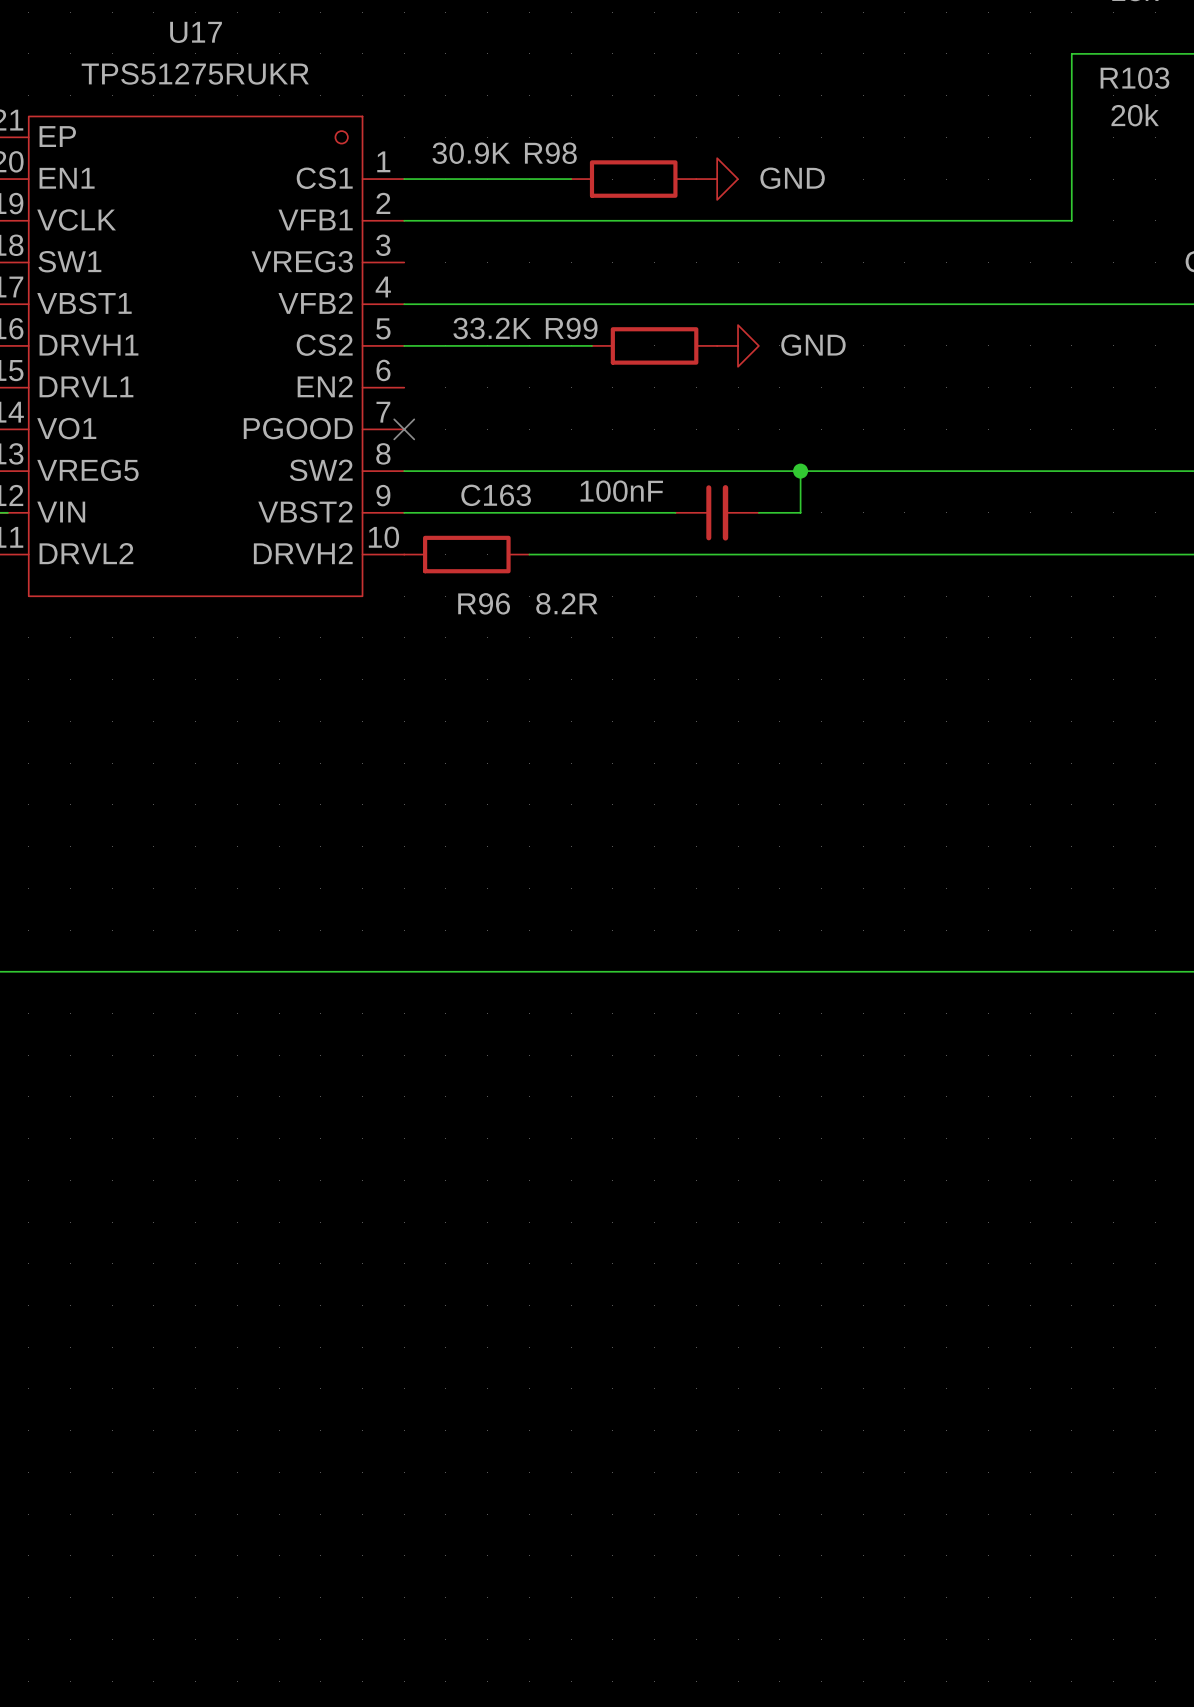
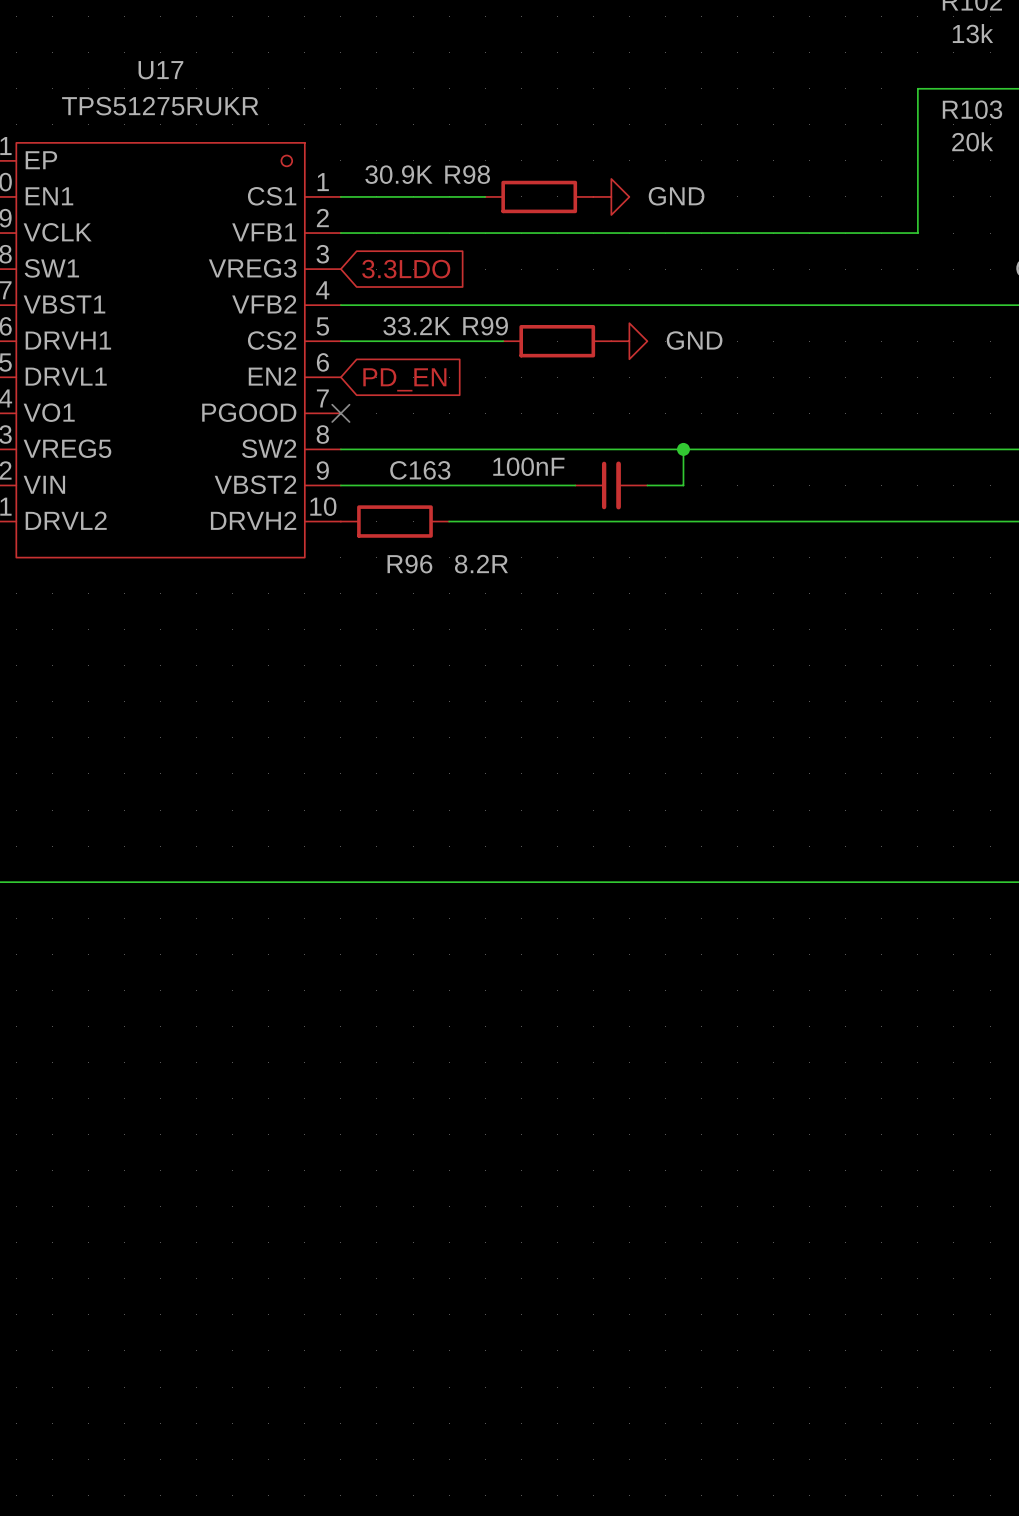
global label: none -> 3.3LDO (406, 269)
global label: none -> PD_EN (404, 379)

